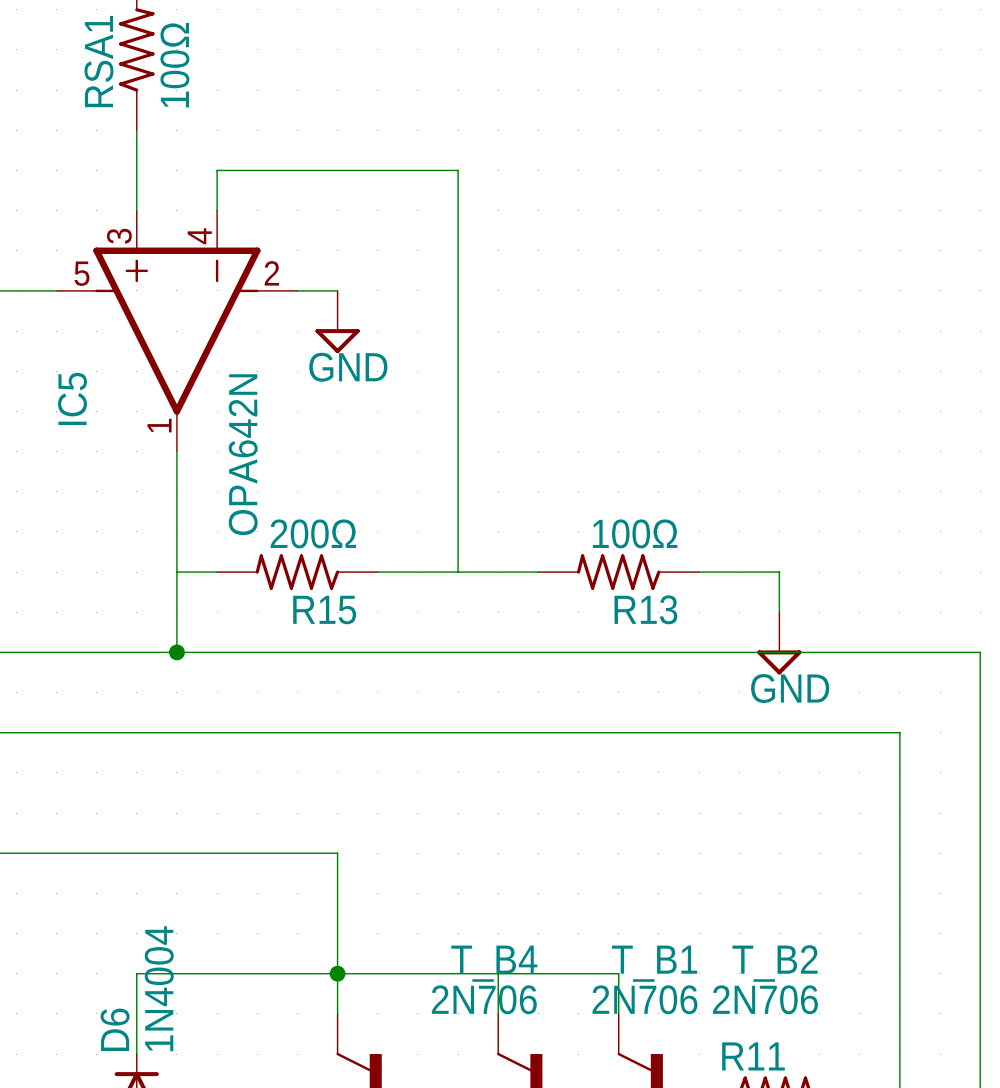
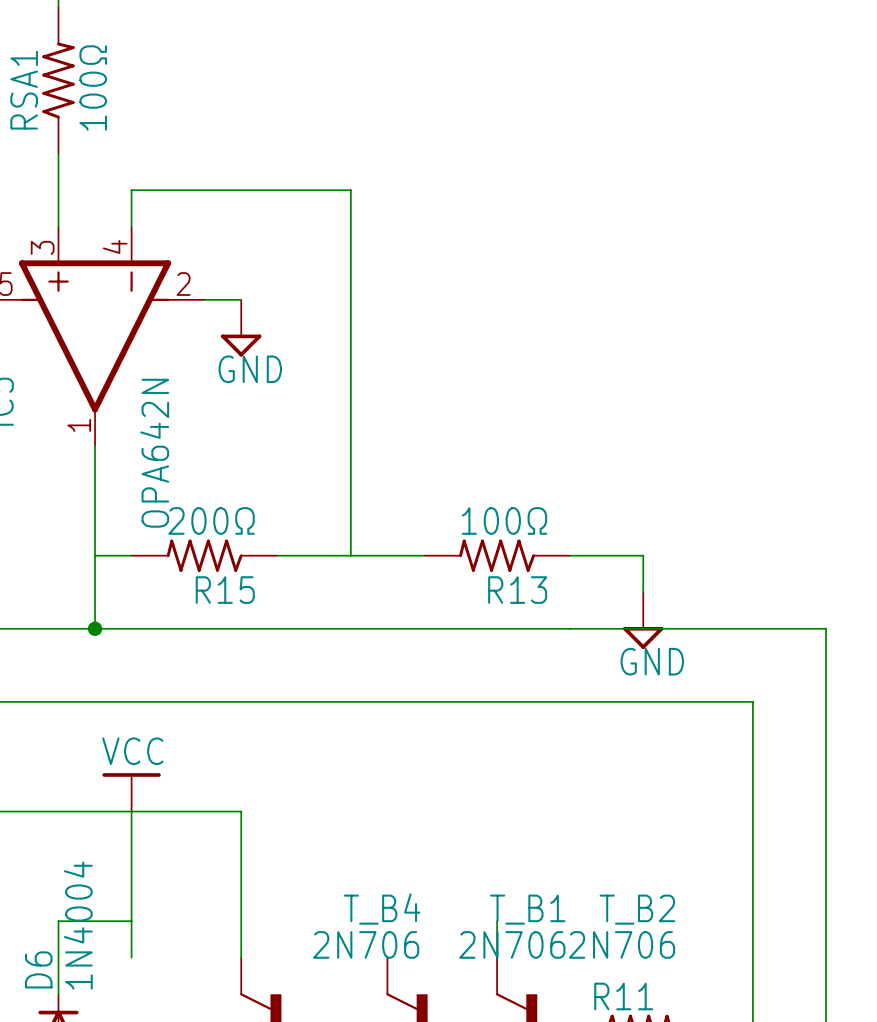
power symbol: none -> VCC (131, 792)
wire: none -> (131, 811) (131, 957)
wire: (217, 973) (618, 973) -> none
junction: (337, 973) -> none
wire: (498, 973) (498, 1013) -> none

